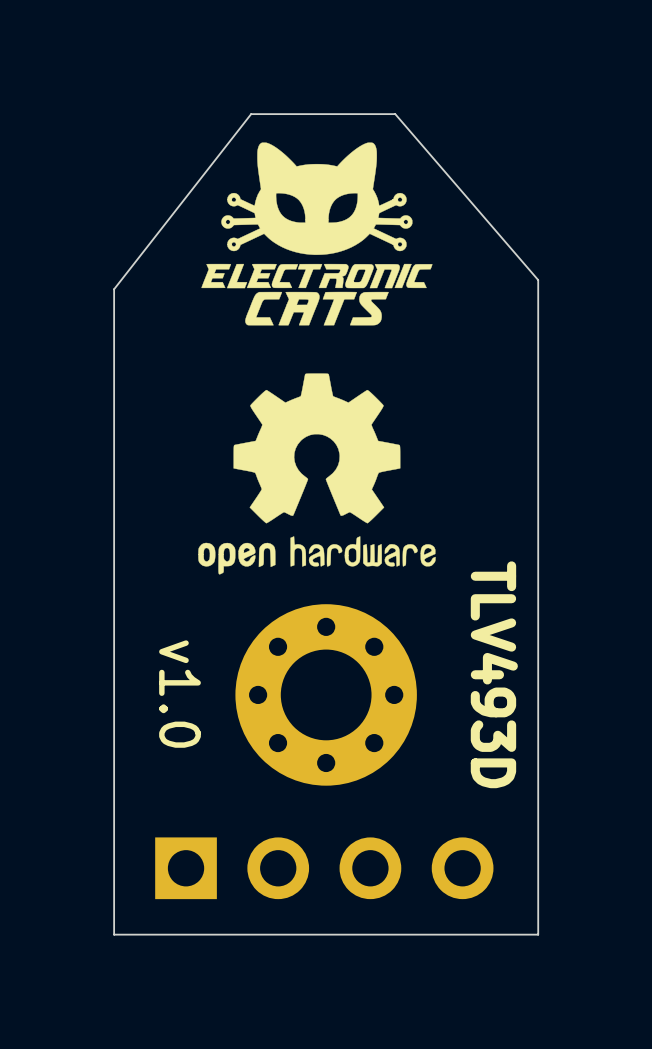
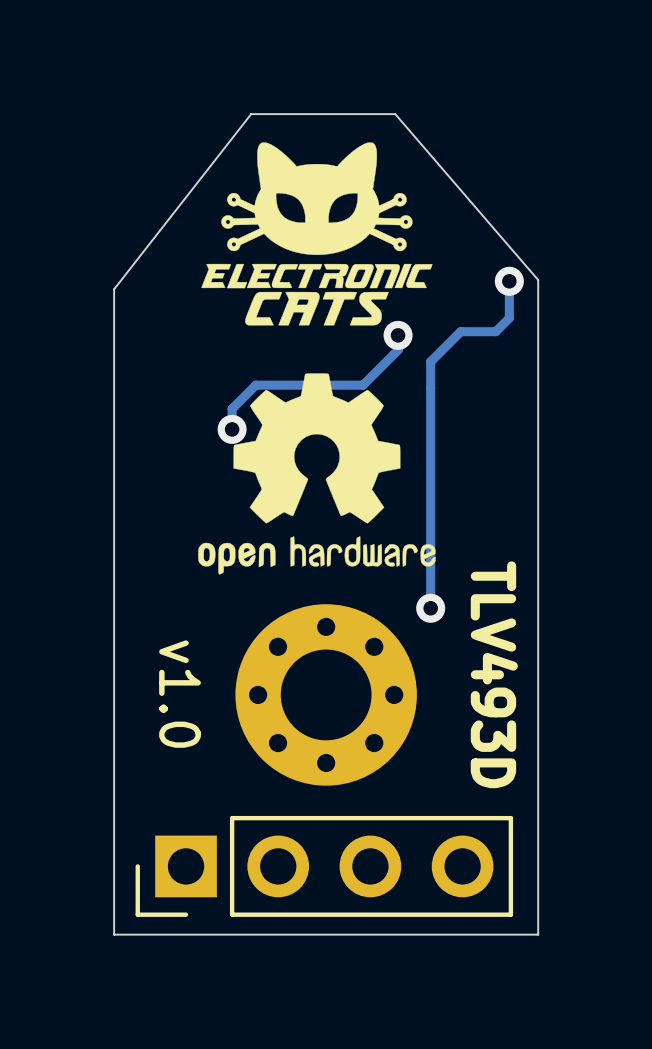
track: none -> (509, 281) (509, 318) (495, 331) (460, 331) (430, 361) (430, 608)
via: none -> (509, 281)
track: none -> (398, 335) (398, 350) (363, 385) (255, 385) (232, 408) (232, 429)
via: none -> (398, 335)
via: none -> (232, 429)
via: none -> (430, 608)
part side: top (324, 868) -> bottom (324, 866)

